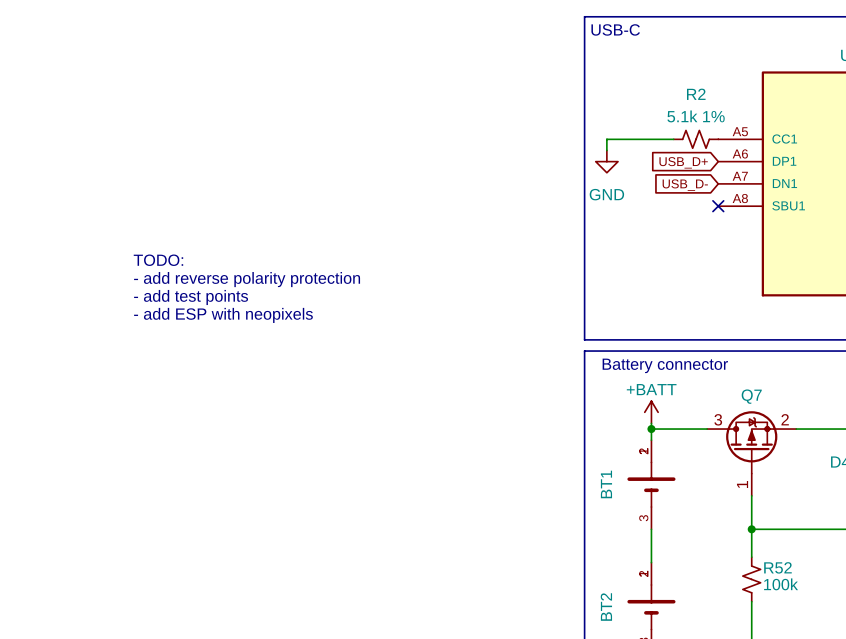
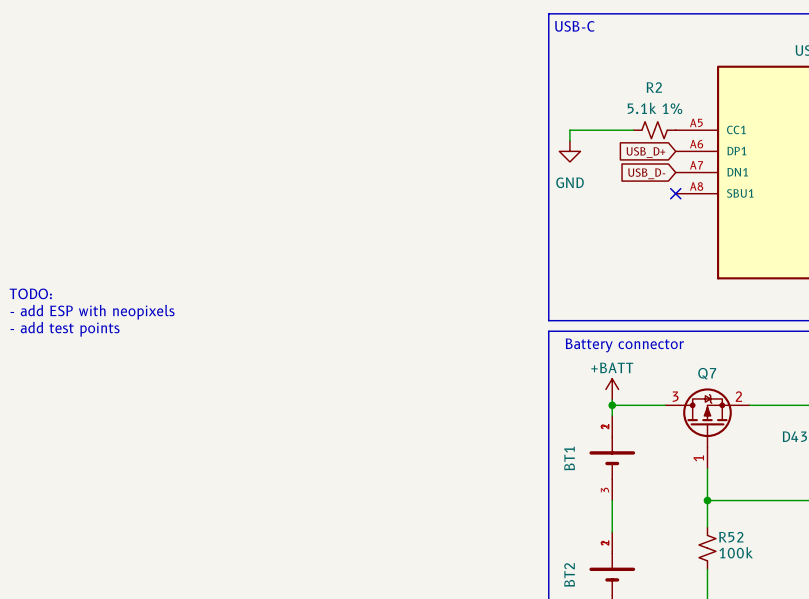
text position: TODO: (158, 260) -> TODO: (30, 293)
text: - add reverse polarity protection (247, 279) -> none
text position: - add test points (191, 297) -> - add test points (65, 329)
text position: - add ESP with neopixels (223, 315) -> - add ESP with neopixels (92, 312)

